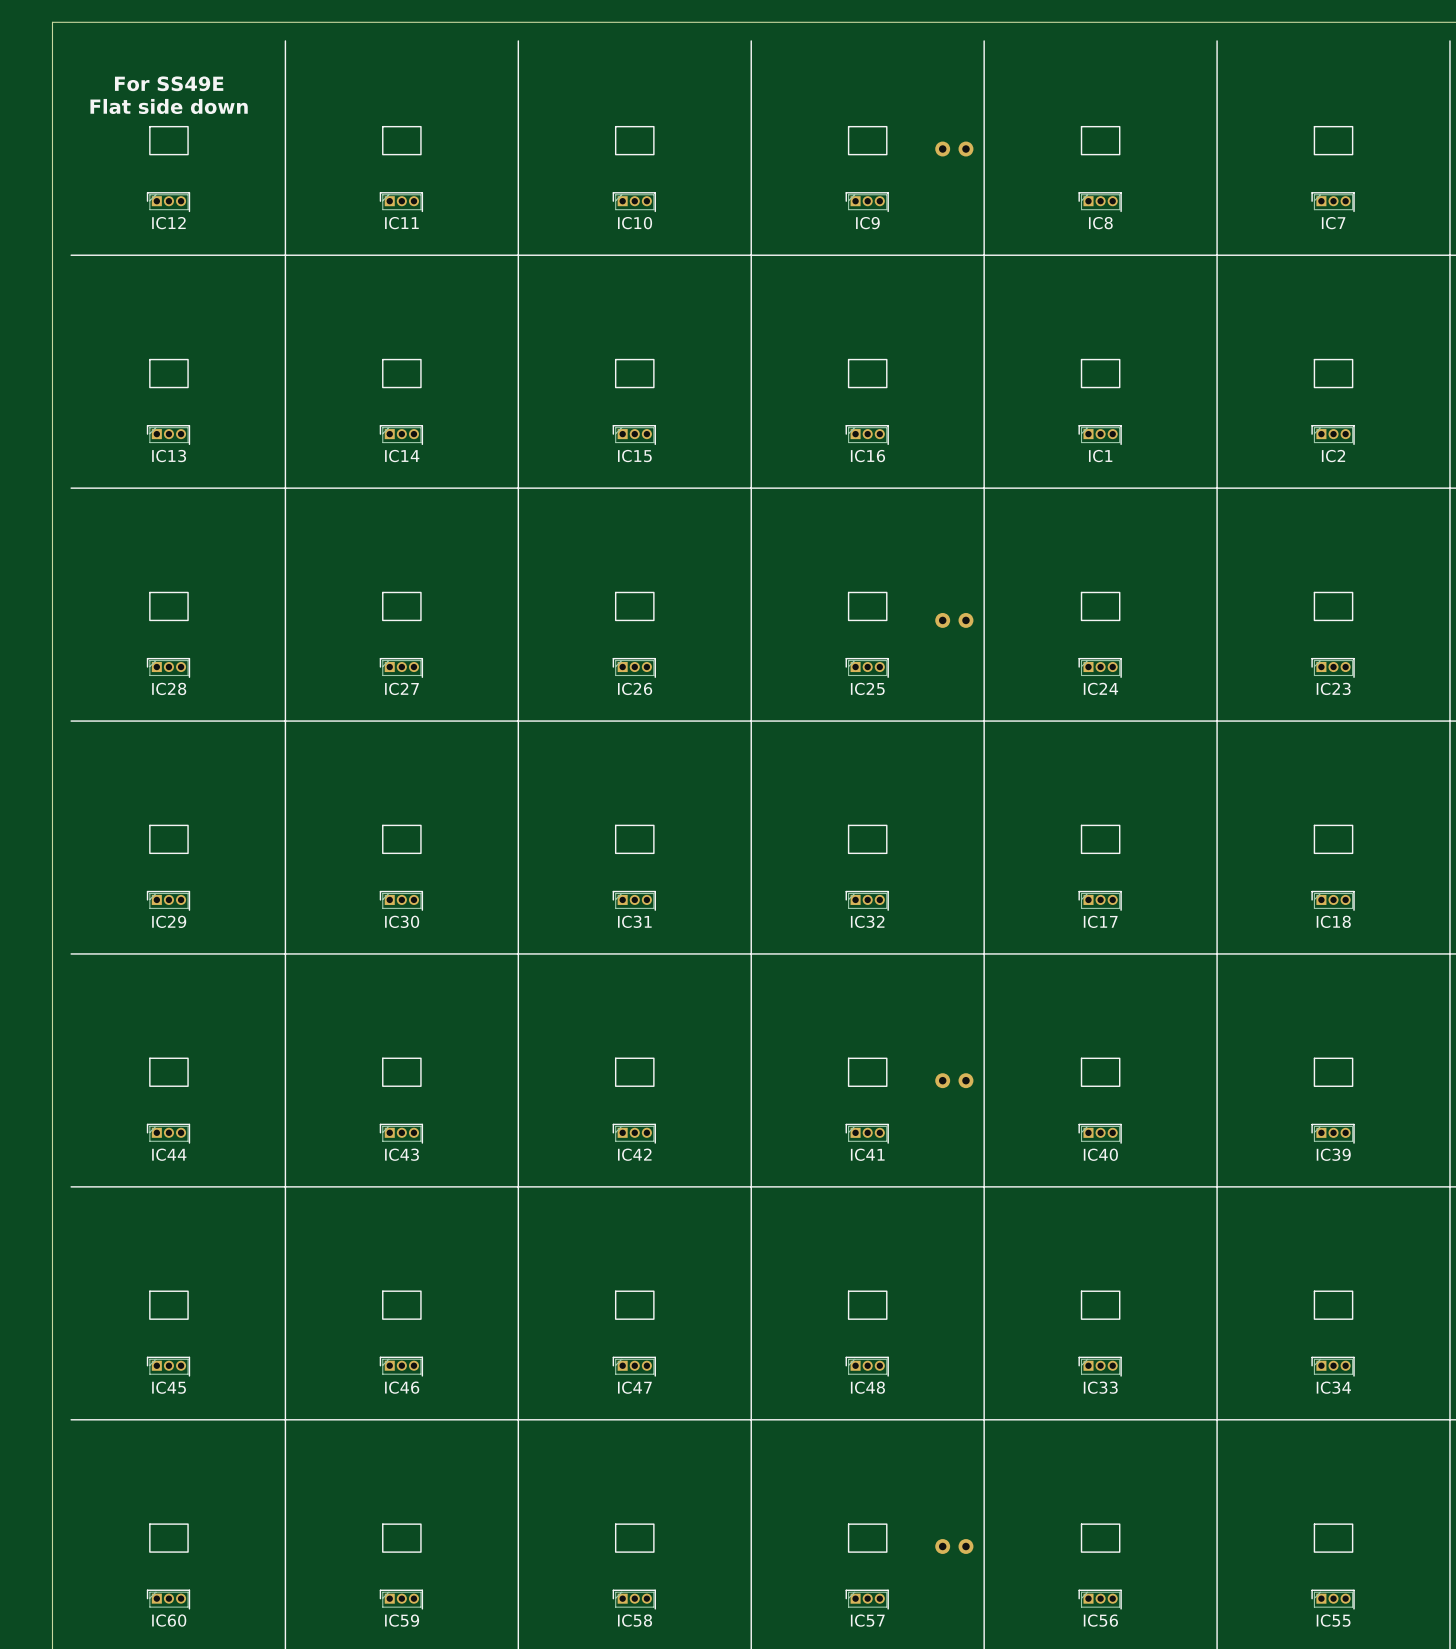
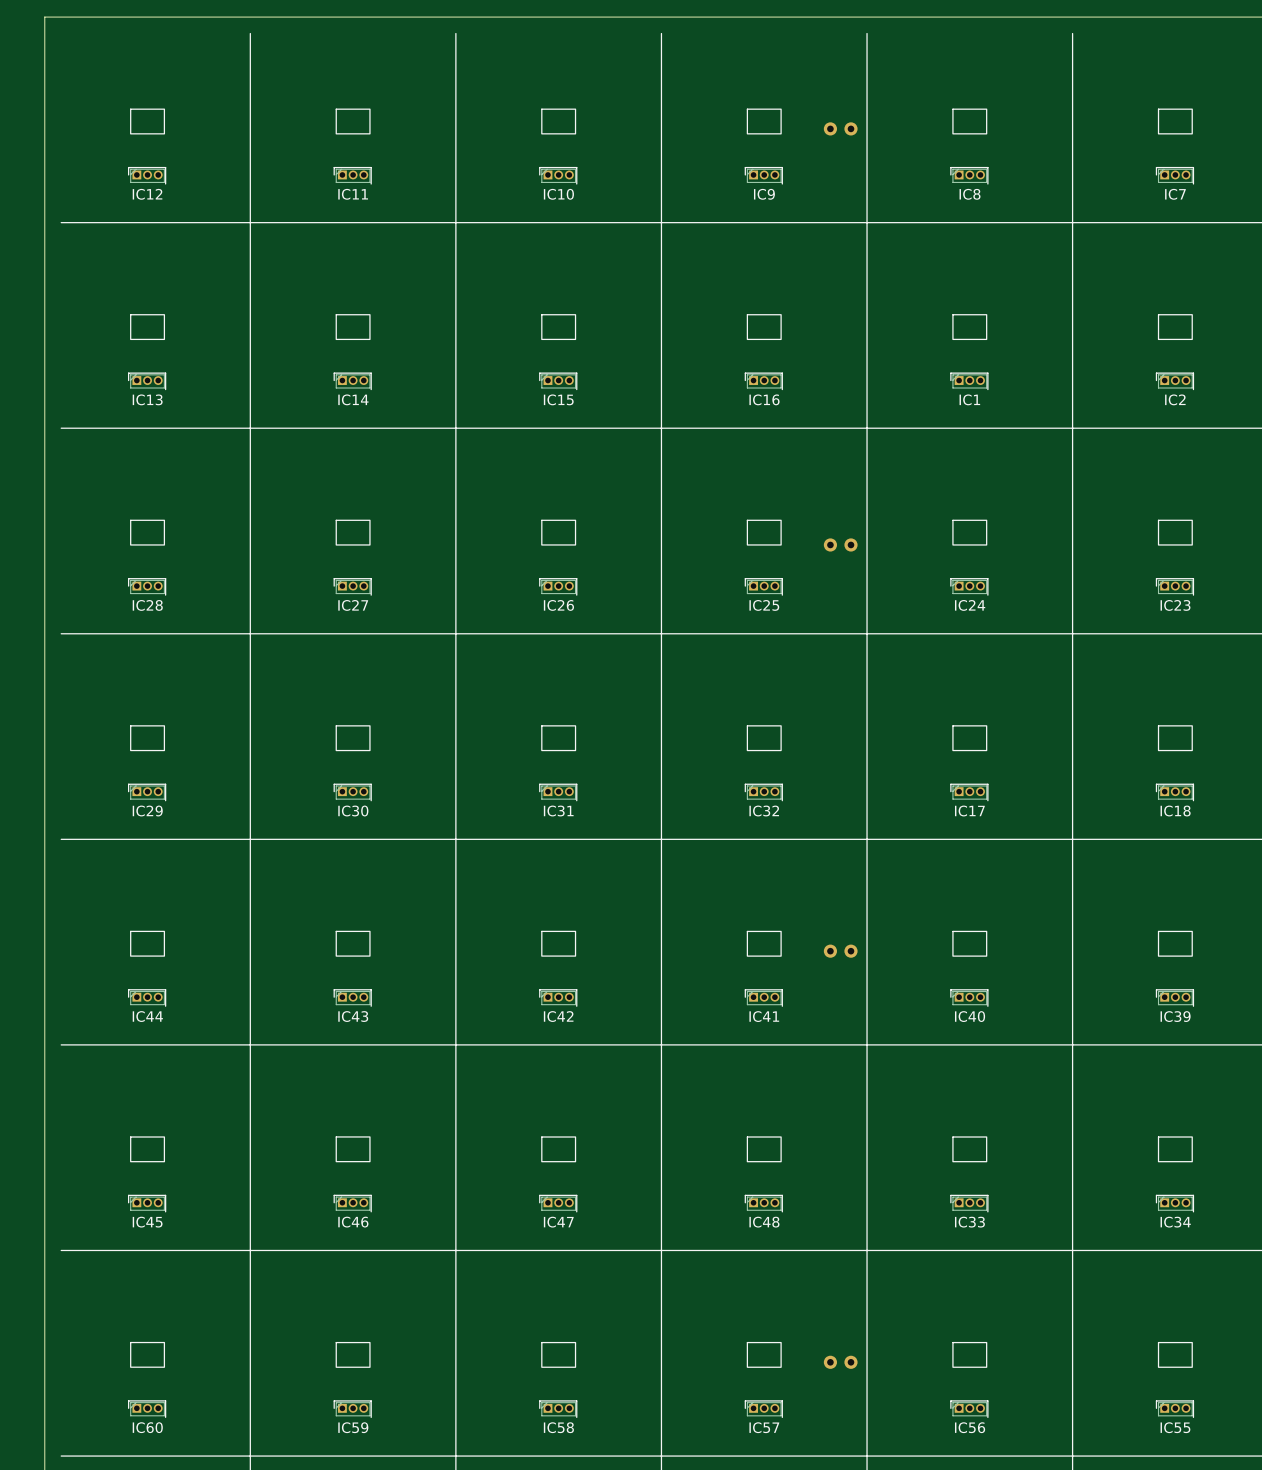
text: For SS49E (169, 83) -> none
text: Flat side down (169, 106) -> none

